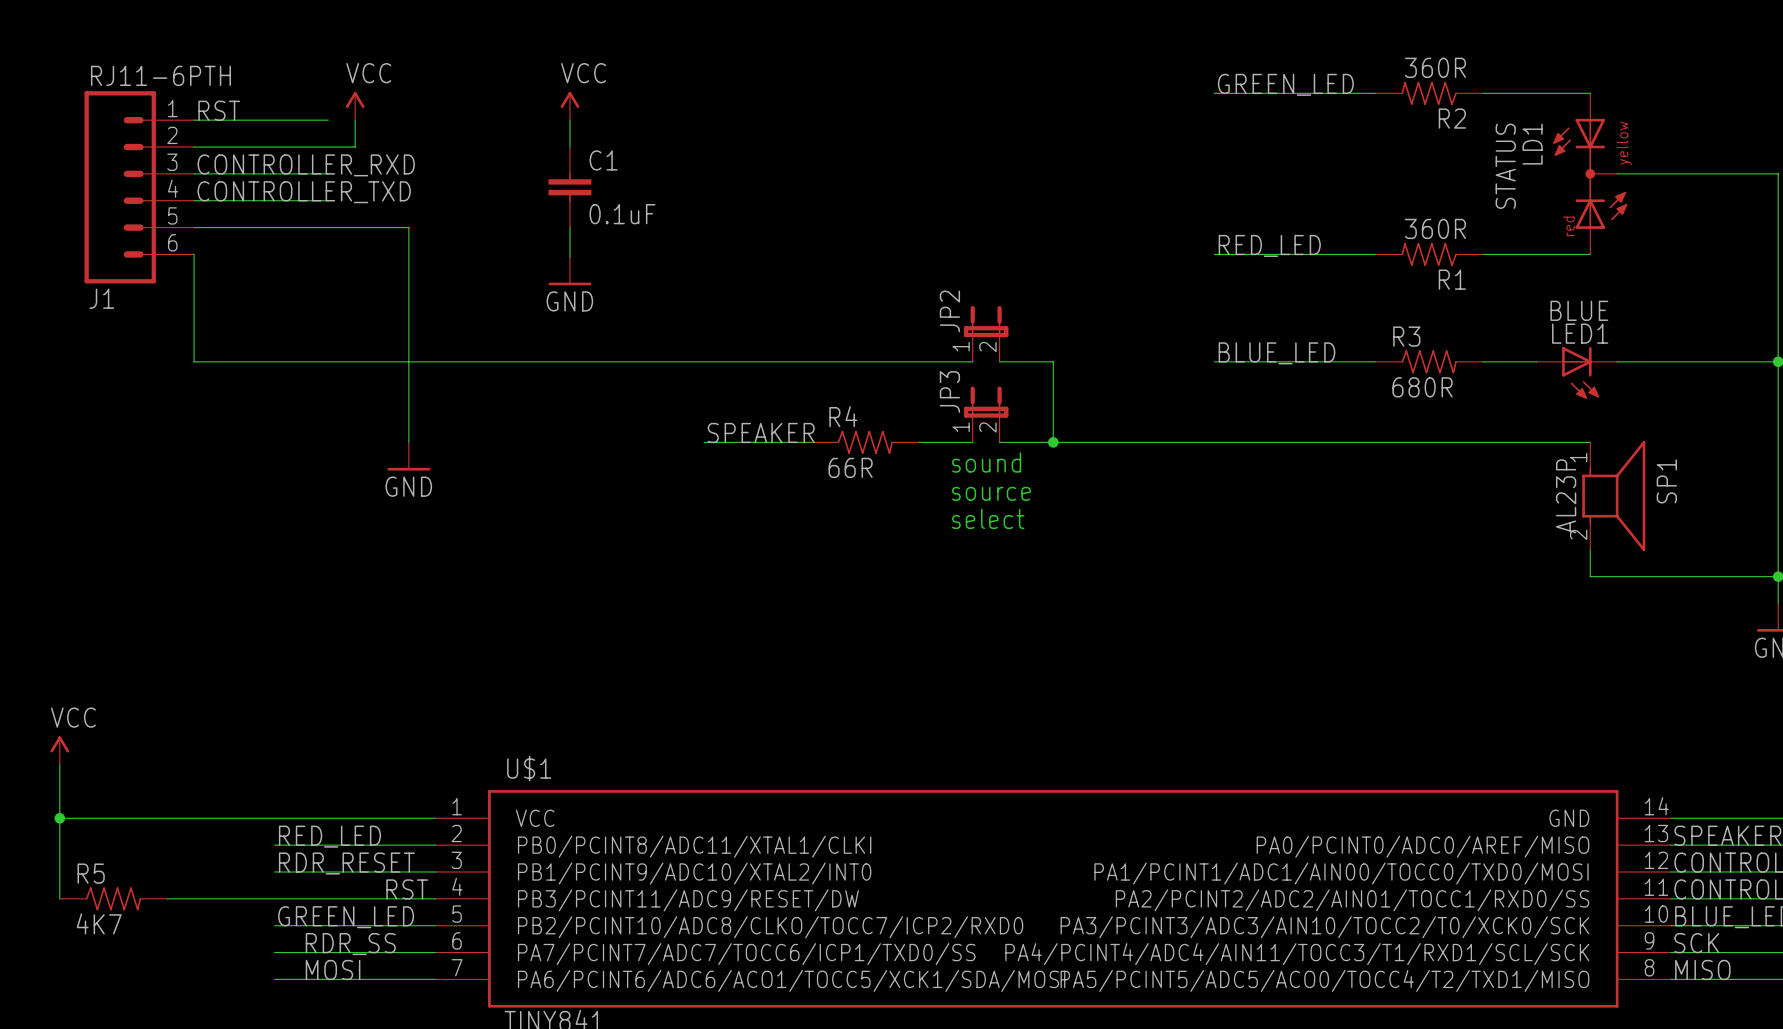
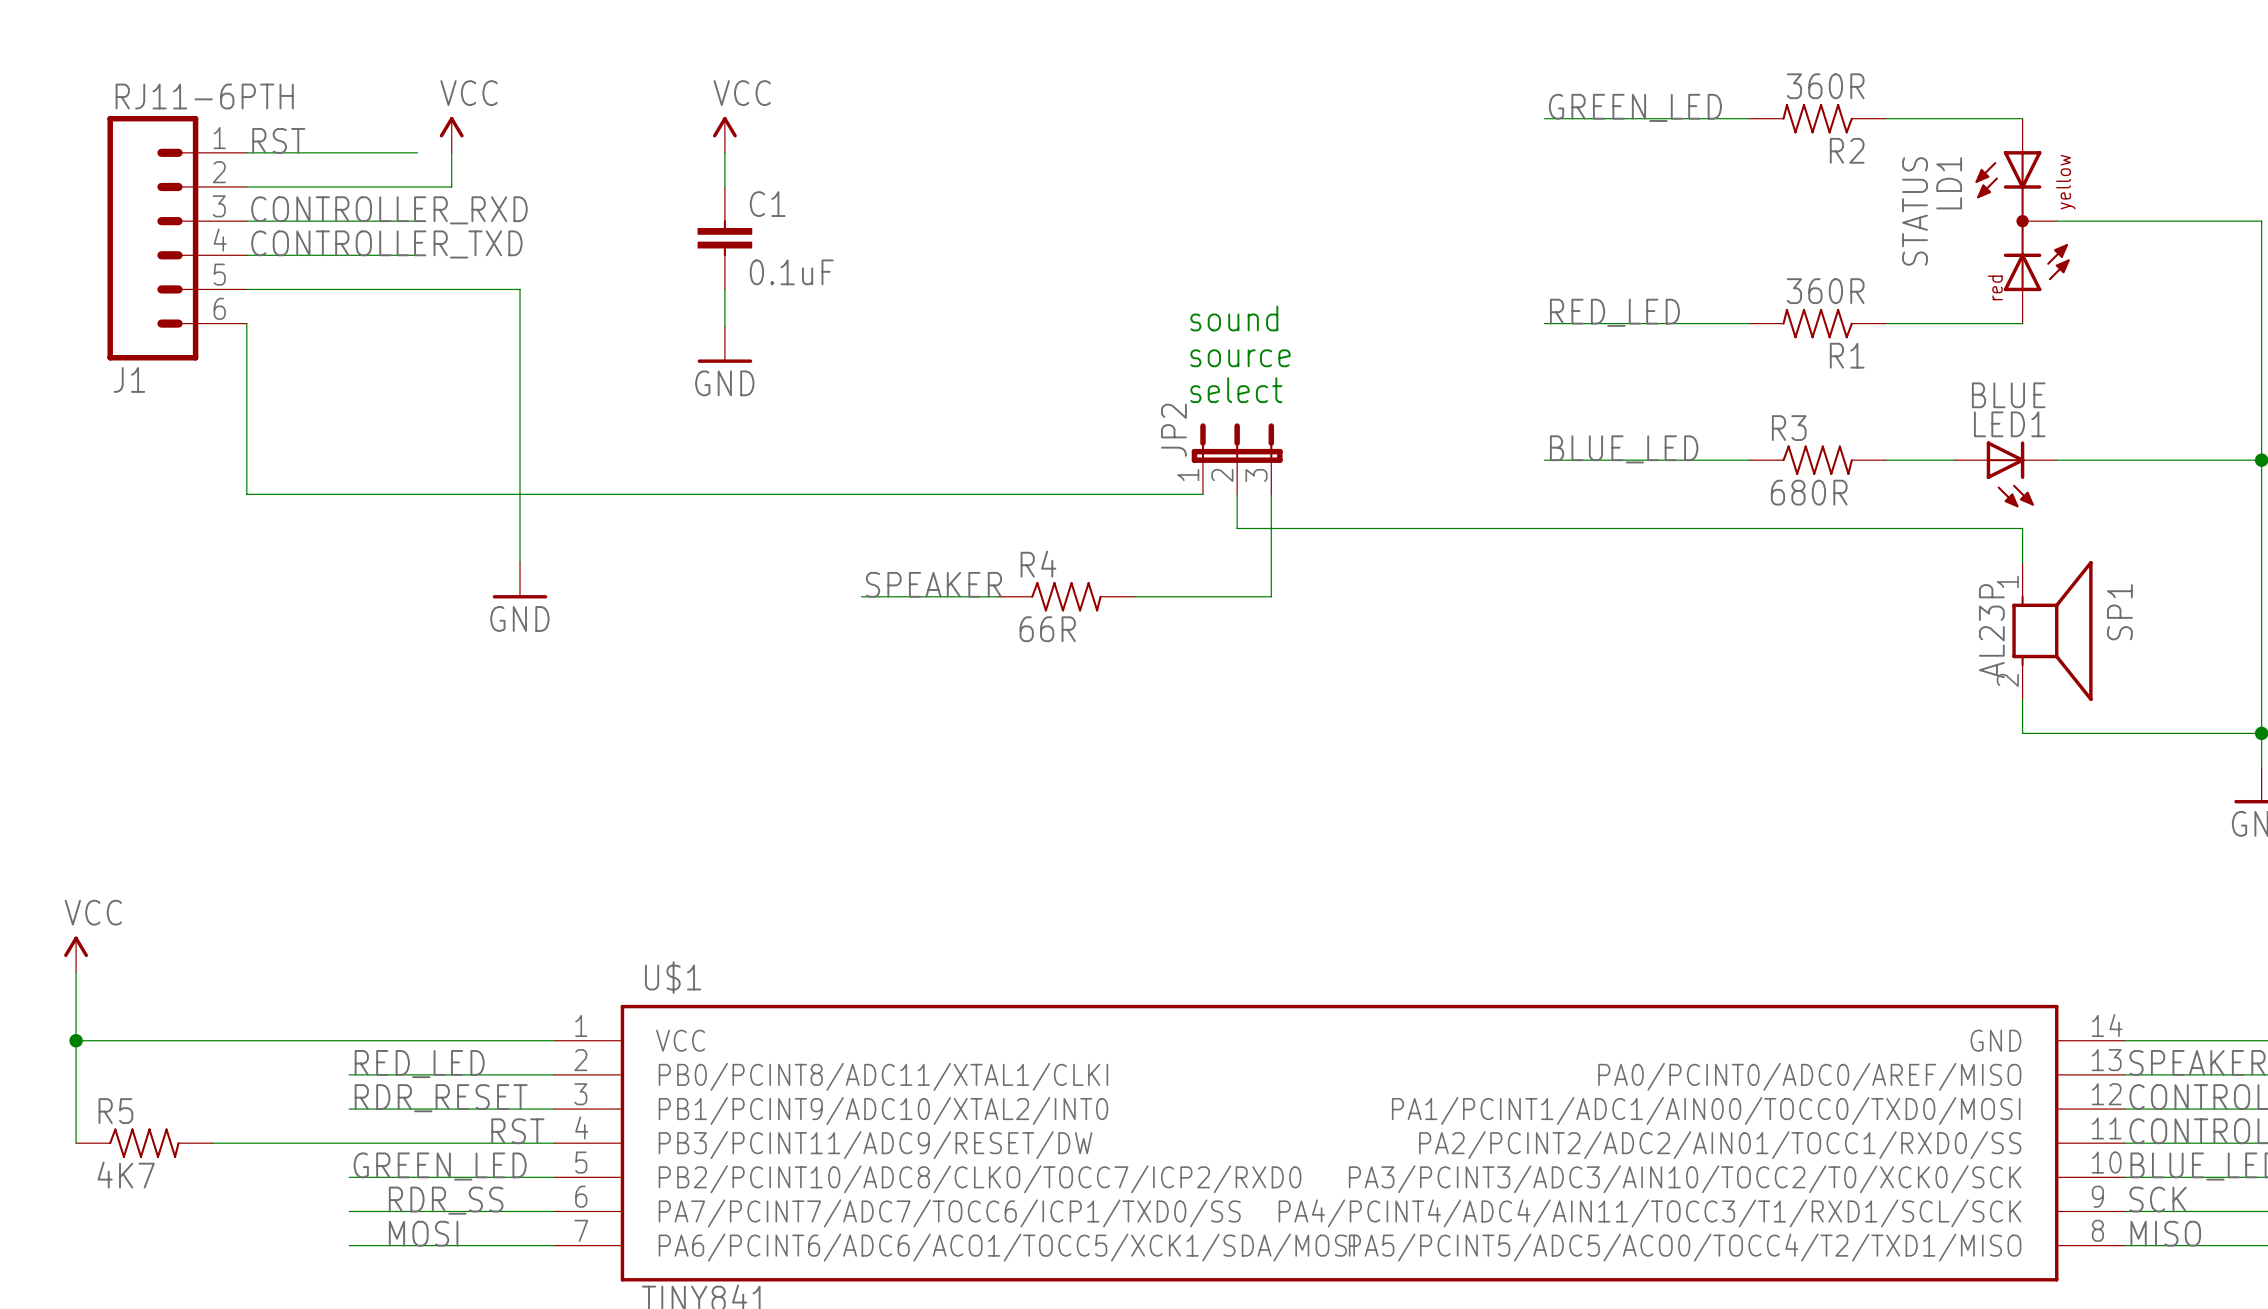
JP2 symbol: [963, 305, 1009, 362] -> [1191, 423, 1283, 495]
wire: (194, 361) (972, 361) -> (246, 460) (246, 494) (1203, 494)
wire: (999, 361) (1053, 361) (1053, 442) -> none
wire: none -> (1271, 494) (1271, 596) (1134, 596)
JP3: (986, 414) -> none
label position: SPEAKER (761, 432) -> SPEAKER (933, 584)
wire: (704, 442) (811, 442) -> (861, 596) (998, 596)
R4 position: (865, 442) -> (1066, 596)
wire: (919, 442) (972, 442) -> none
wire: (999, 442) (1590, 442) -> (1237, 494) (1237, 528) (2022, 528) (2022, 562)
junction: (1053, 442) -> none
text position: sound (986, 462) -> sound (1234, 318)
text position: source (991, 493) -> source (1240, 358)
text position: select (988, 518) -> select (1236, 390)

